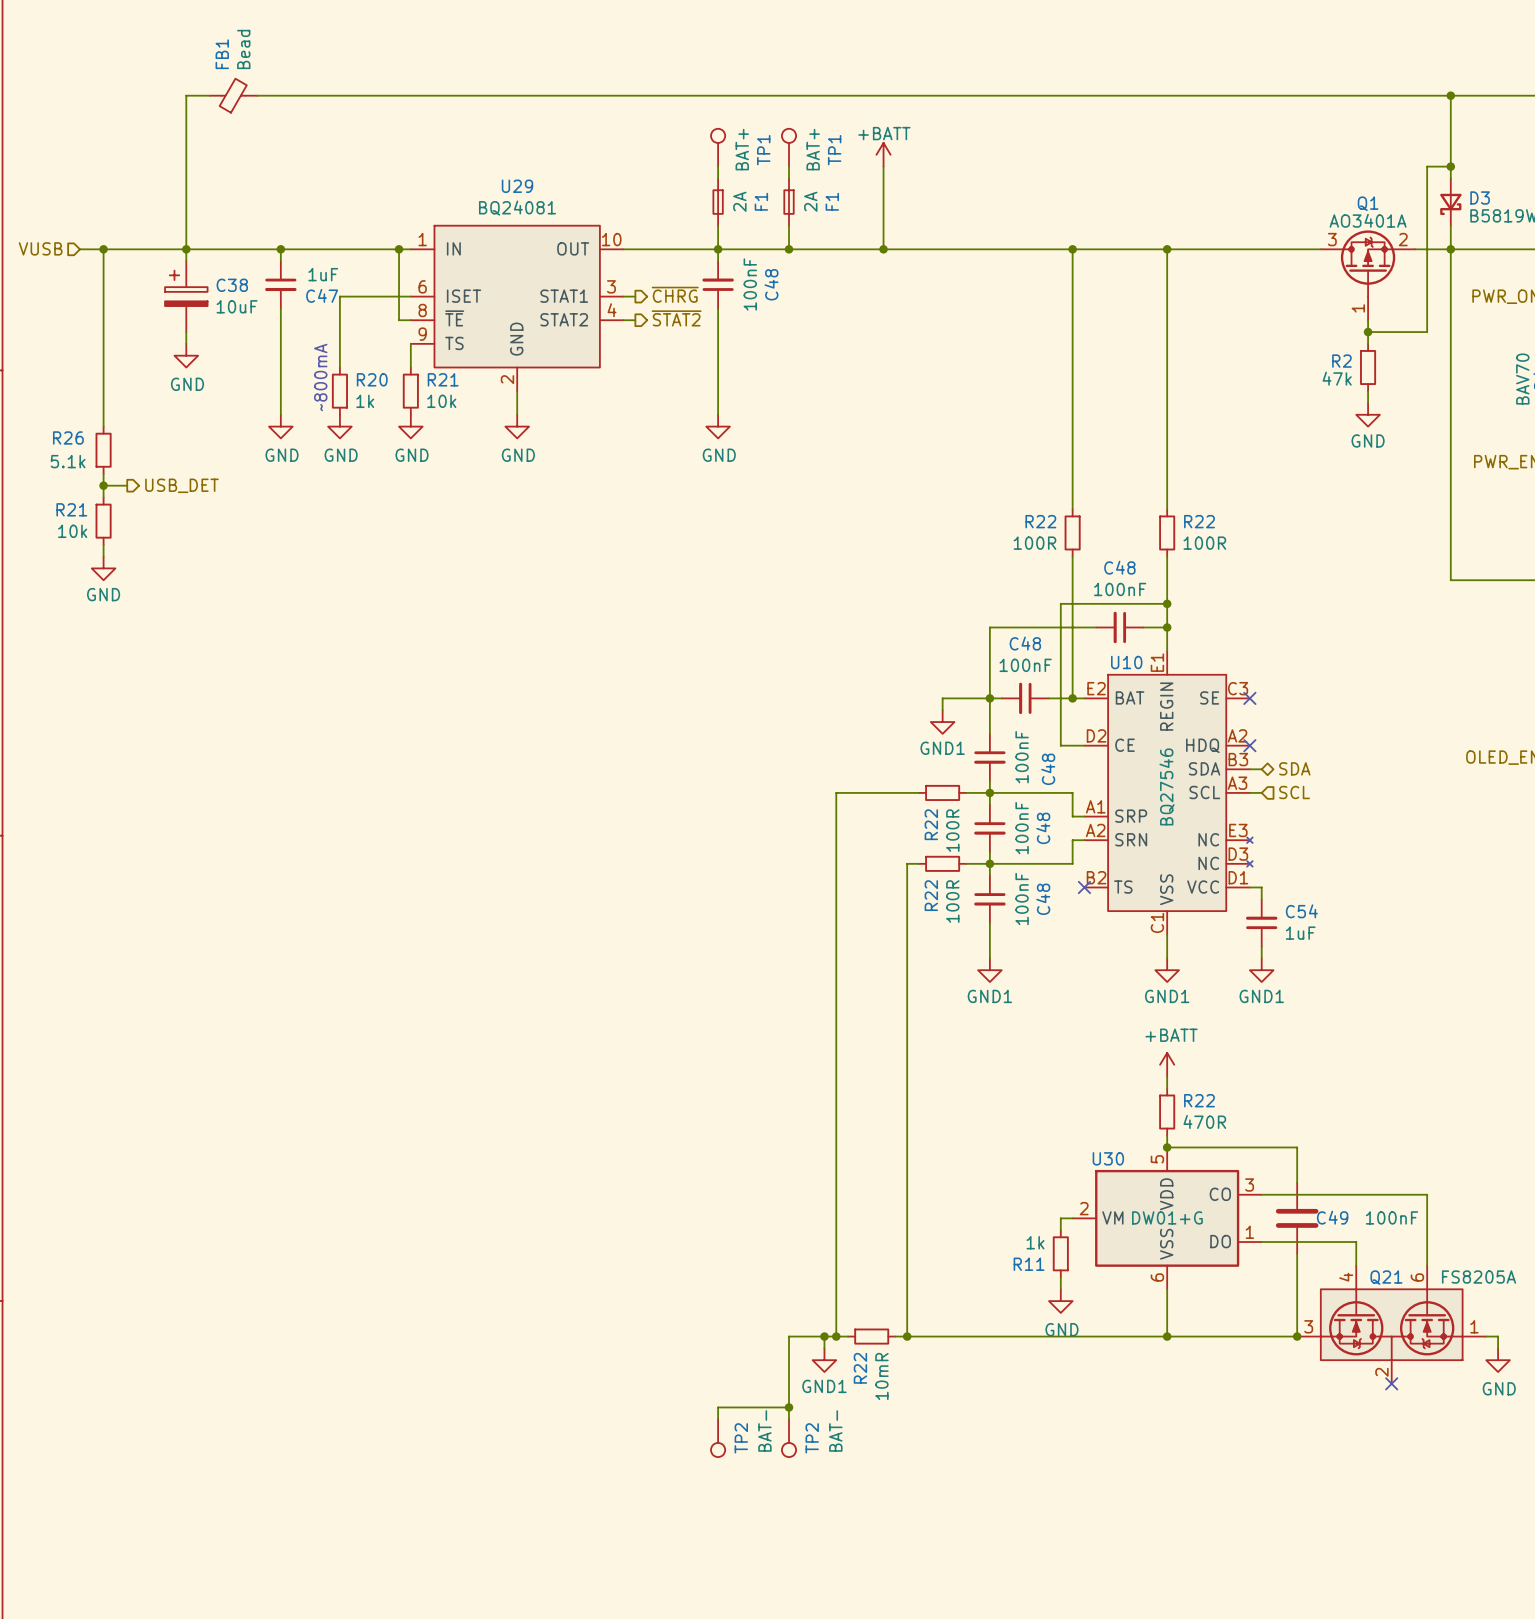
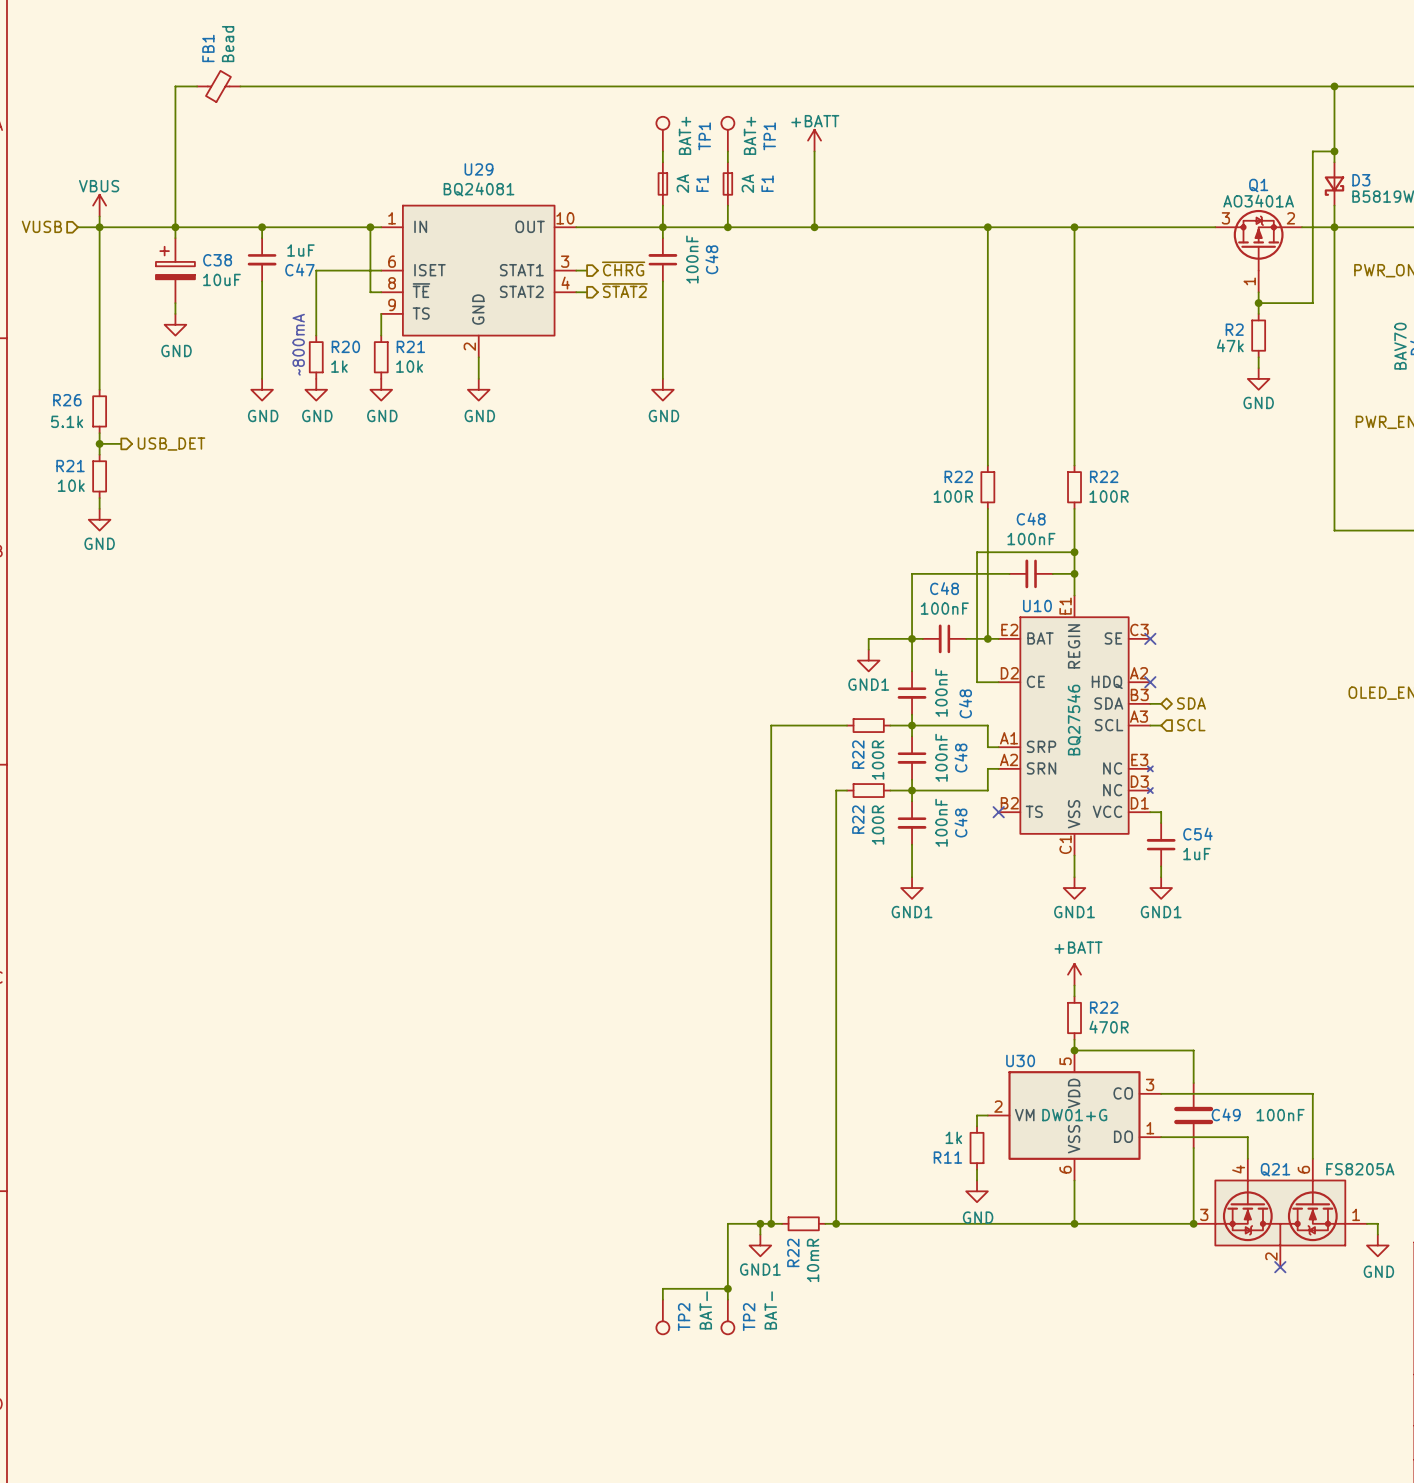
power symbol: none -> VBUS (99, 205)
wire: none -> (99, 216) (99, 227)

